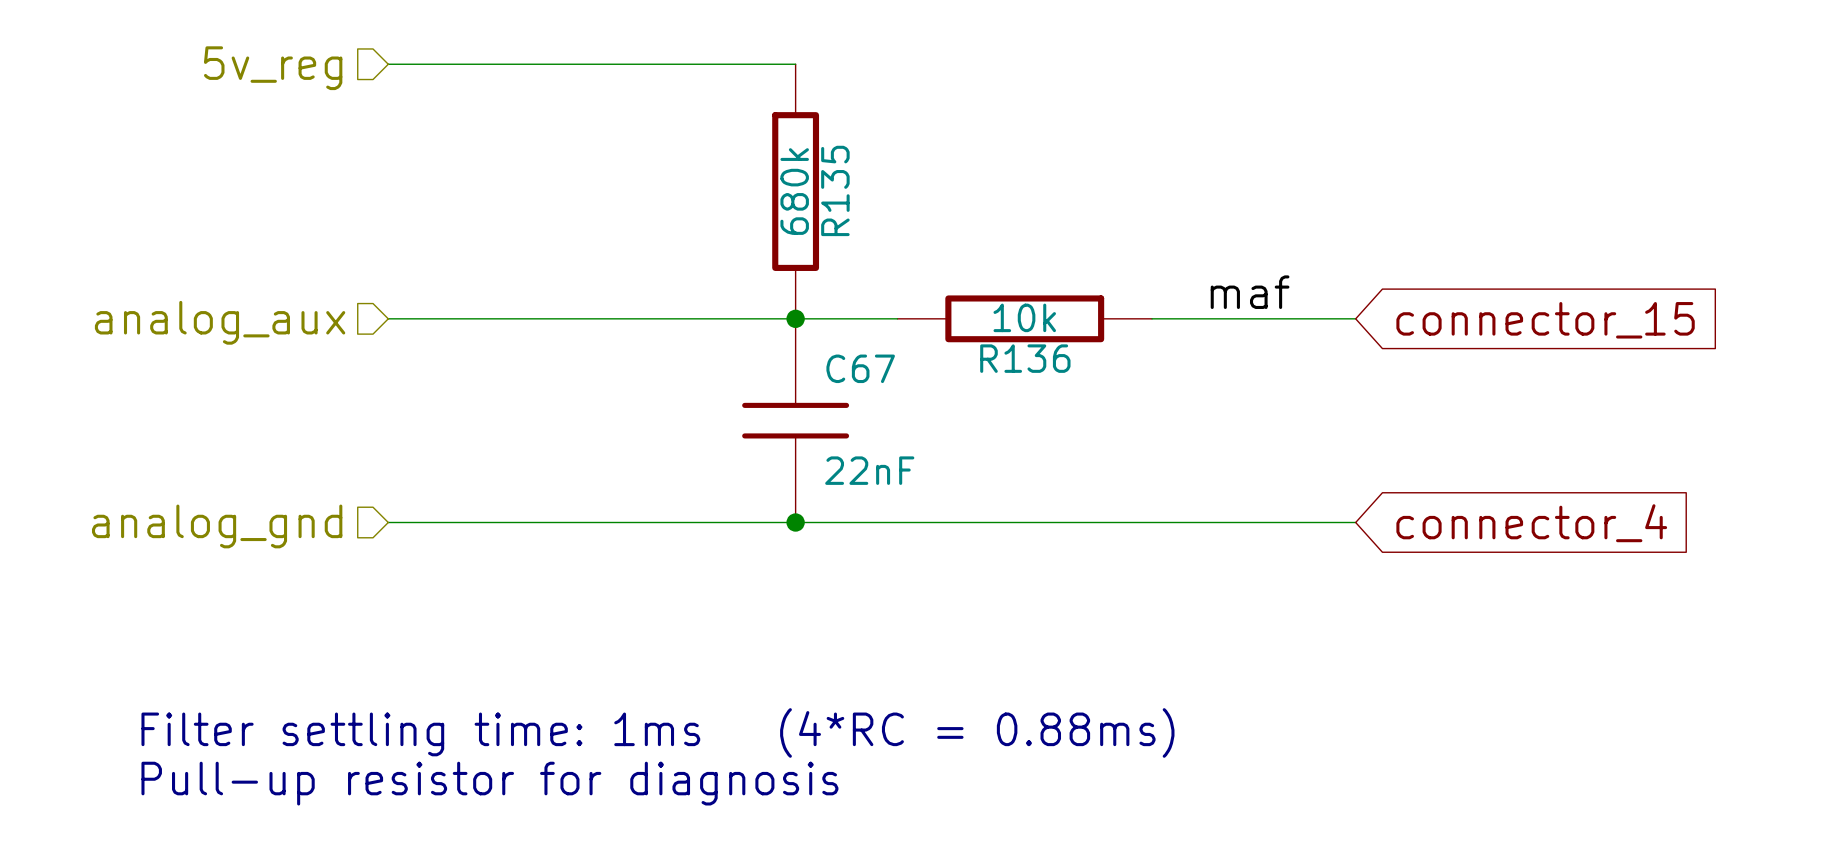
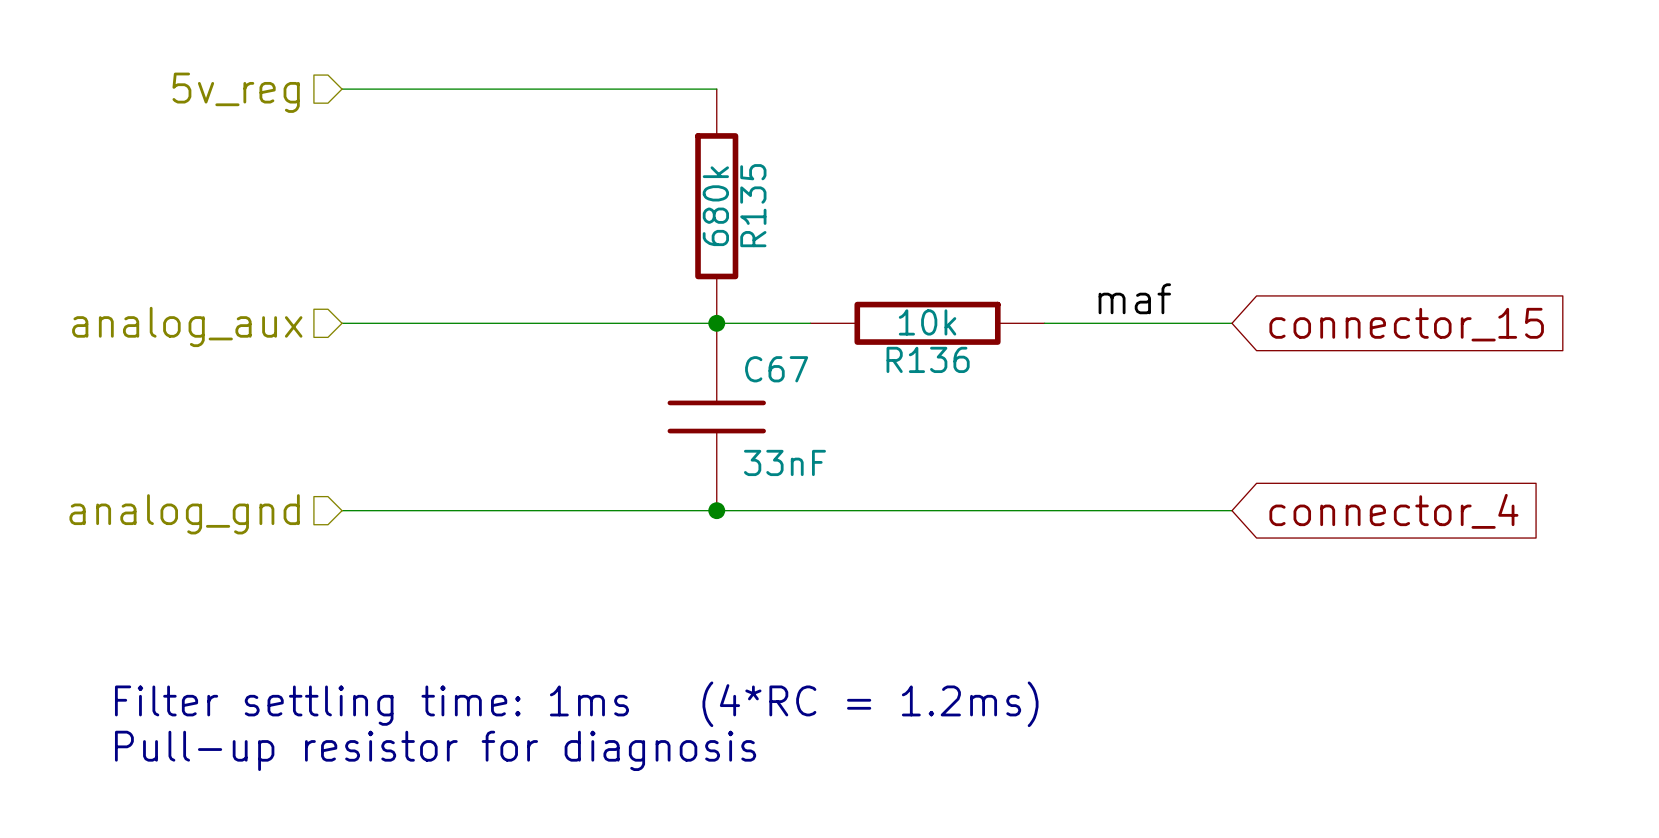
C67 value: 22nF (869, 470) -> 33nF (784, 462)
text: Filter settling time: 1ms (4*RC = 0.88ms) (657, 732) -> Filter settling time: 1ms (4*RC = 1.2ms) (576, 704)

